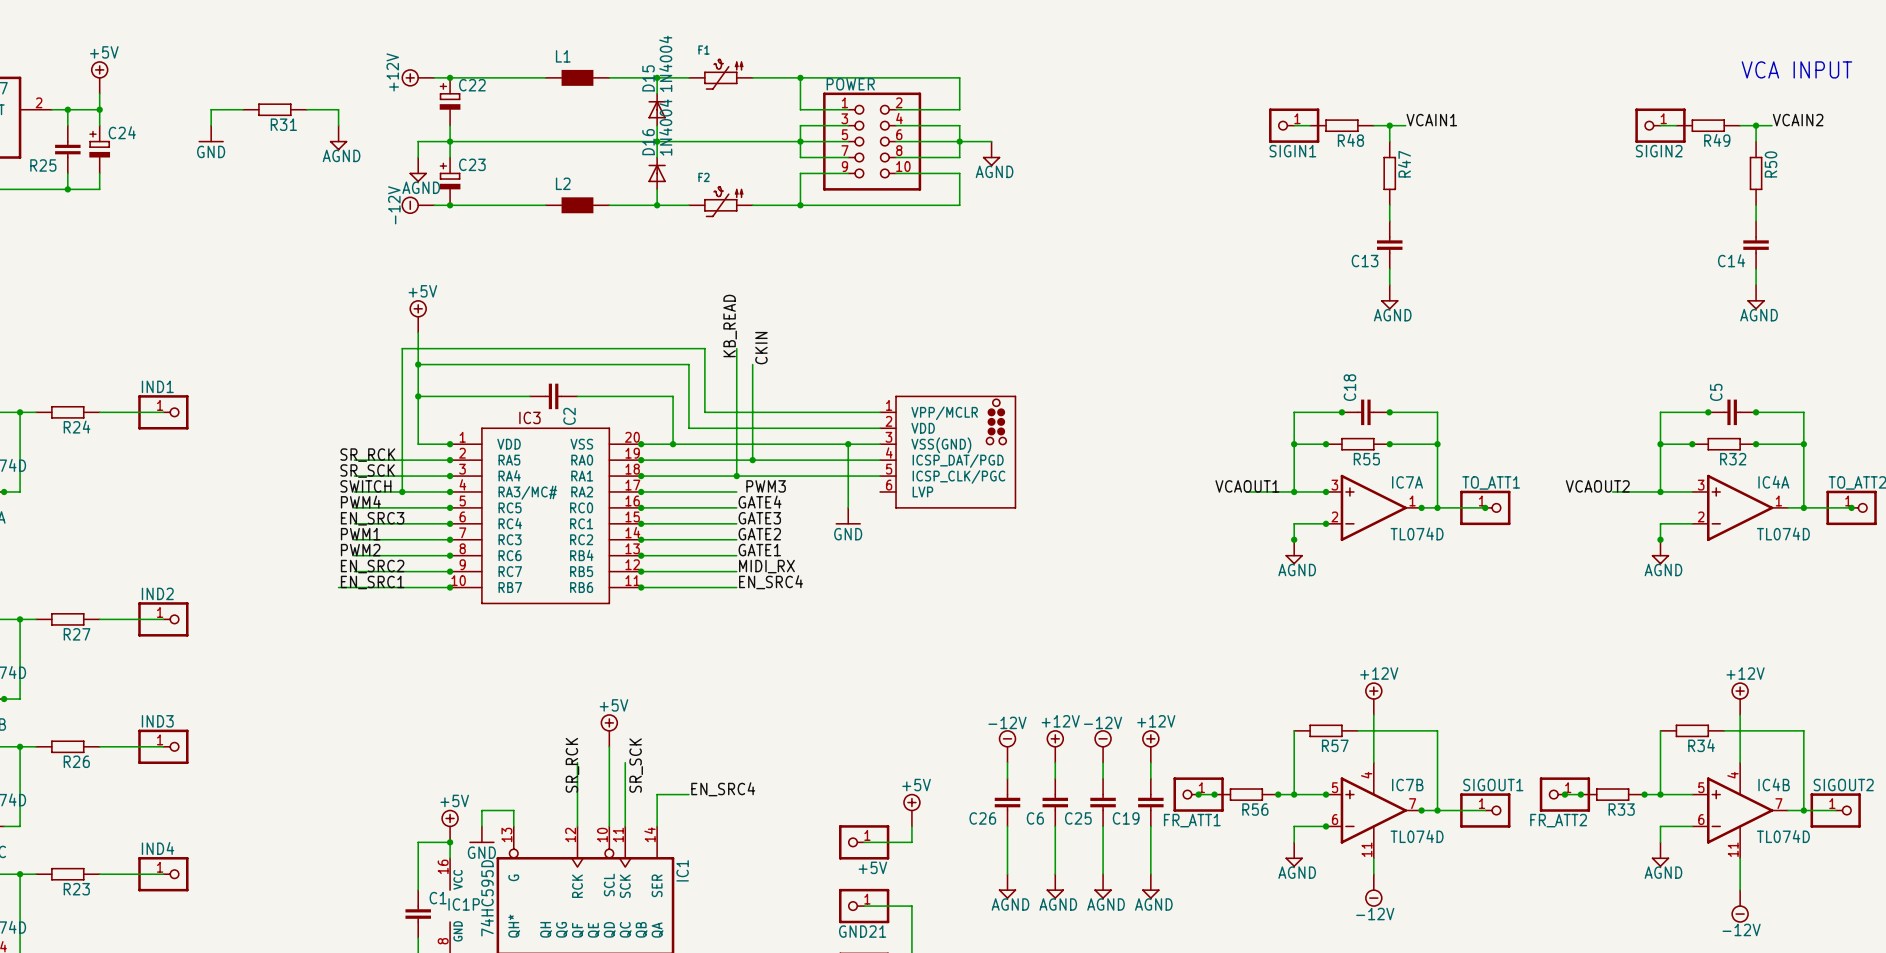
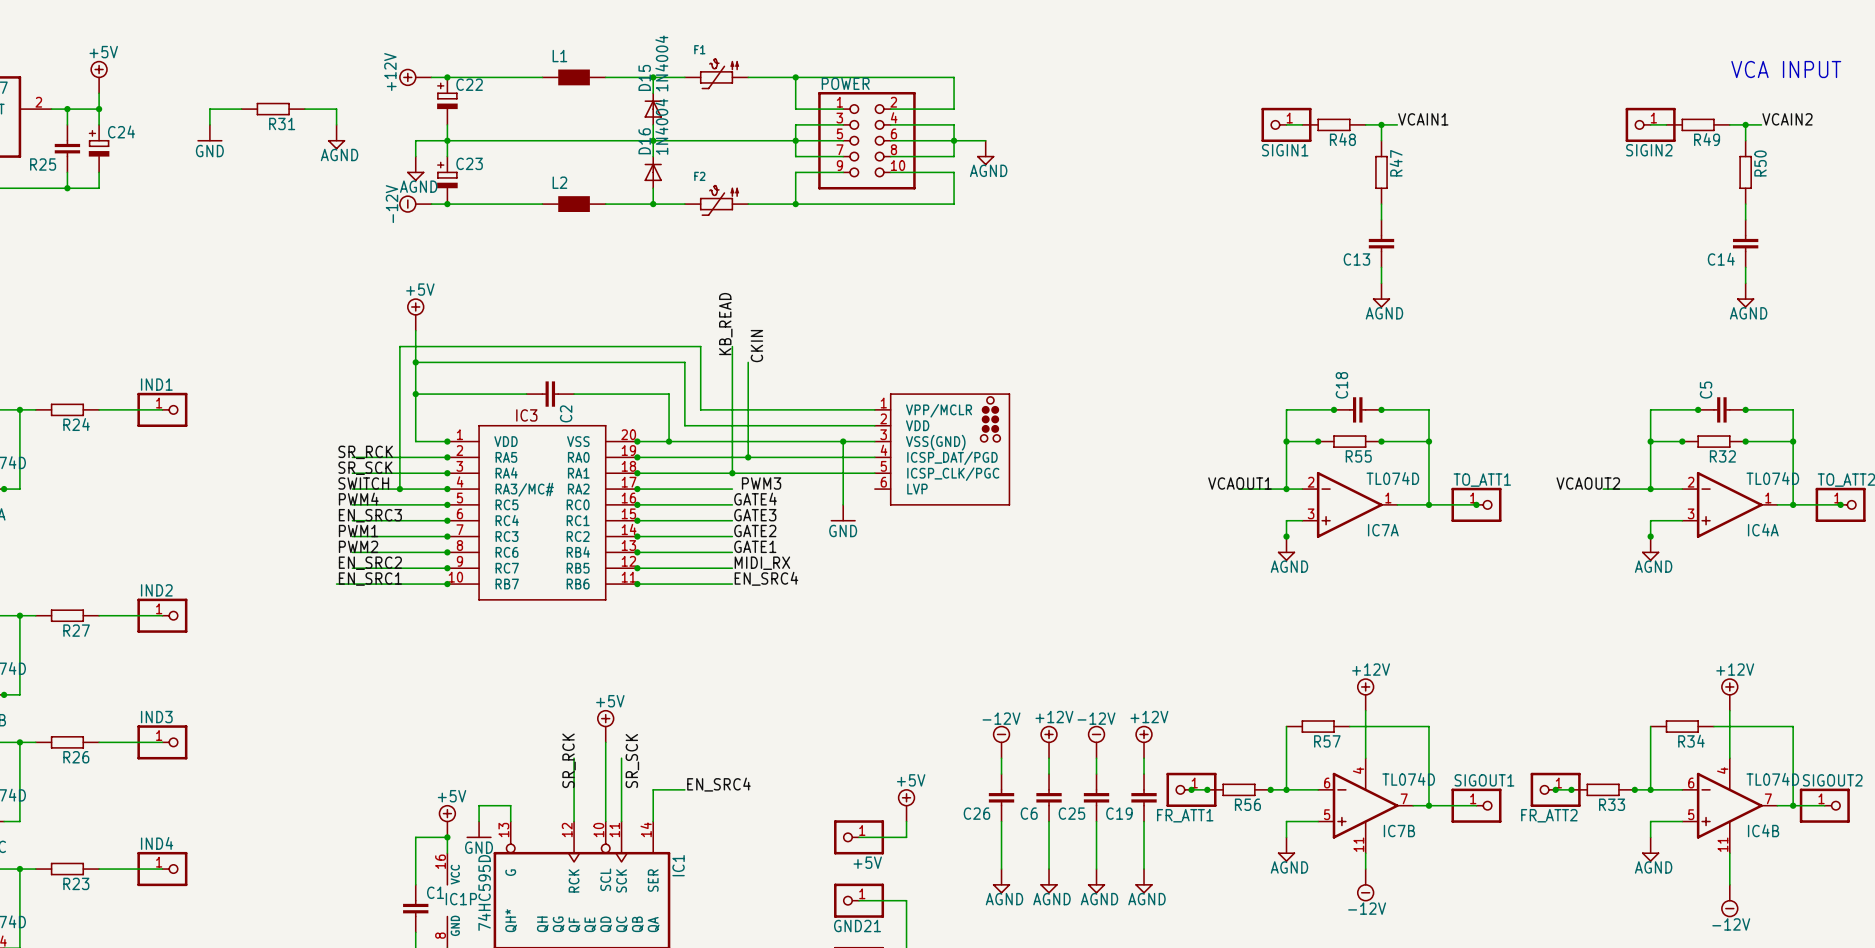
junction: (1326, 491) -> none
IC7A flip: as is (1373, 507) -> up-down (1349, 504)
junction: (1421, 507) -> none
IC4A flip: as is (1740, 507) -> up-down (1729, 504)
junction: (1326, 523) -> none
junction: (1326, 794) -> none
IC7B flip: as is (1373, 810) -> up-down (1365, 805)
junction: (1421, 810) -> none
IC4B flip: as is (1740, 810) -> up-down (1729, 805)
junction: (1326, 826) -> none

